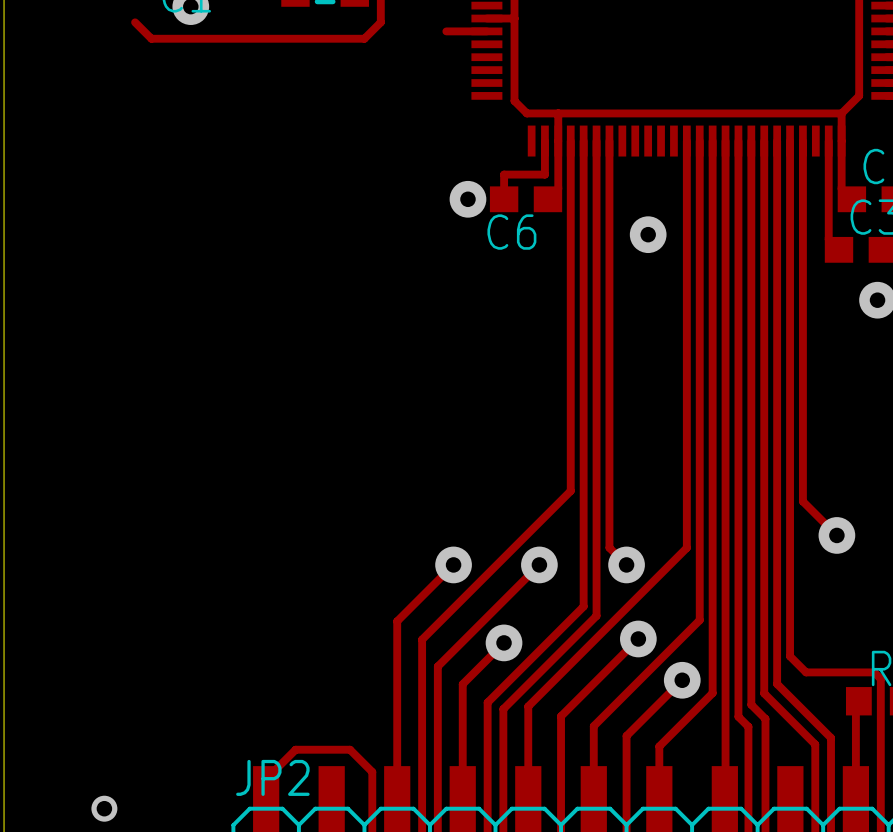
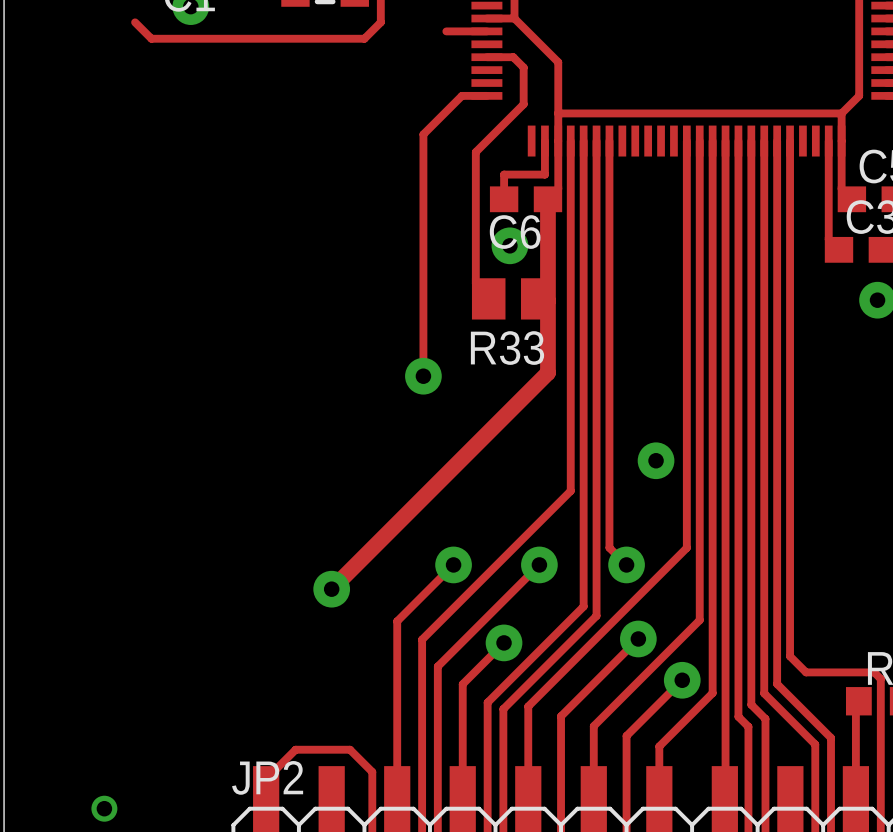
track: (514, 18) (514, 100) (526, 113) (558, 113) -> (514, 18) (558, 62) (558, 113)
track: none -> (486, 57) (513, 57) (523, 67) (523, 104) (475, 152) (475, 283) (488, 298)
track: none -> (486, 95) (461, 95) (423, 134) (423, 376)
track: (802, 141) (802, 501) (836, 535) -> none
via position: (467, 199) -> (509, 245)
track: none -> (547, 199) (547, 372) (331, 589)
via: (648, 234) -> none
R33: none -> (513, 298)
via: none -> (423, 376)
via: none -> (656, 460)
via: (836, 535) -> none
via: none -> (331, 589)

